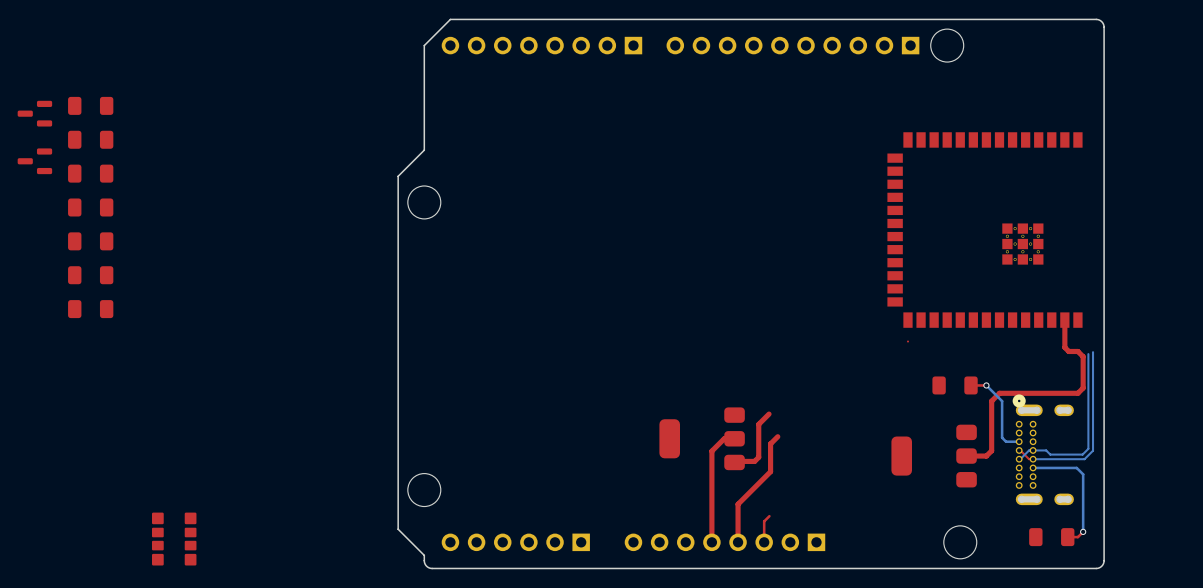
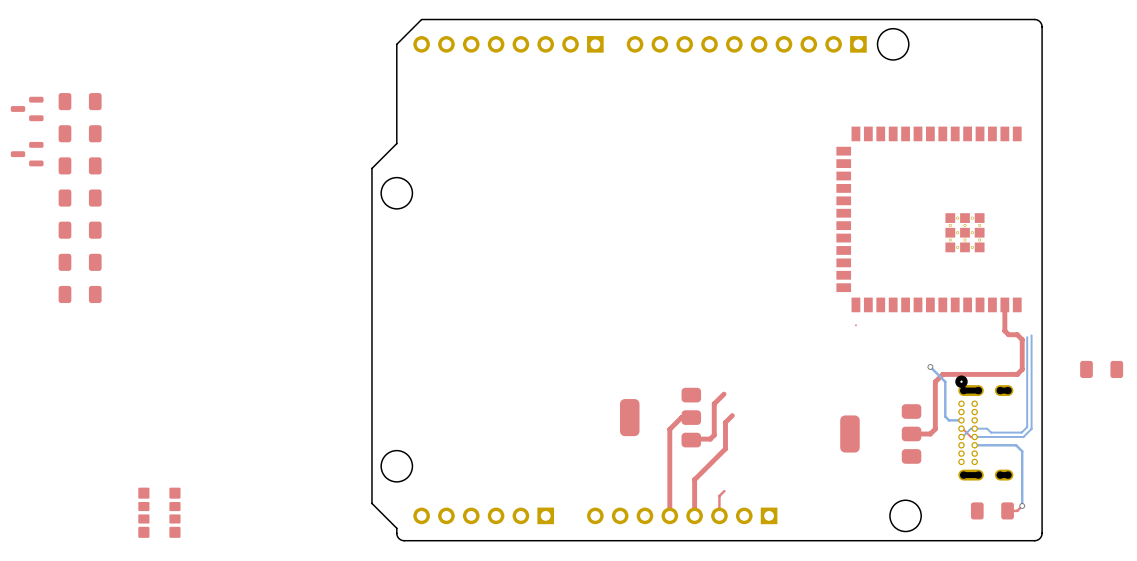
part position: (955, 385) -> (1101, 369)
top track: (986, 385) (971, 385) -> none

